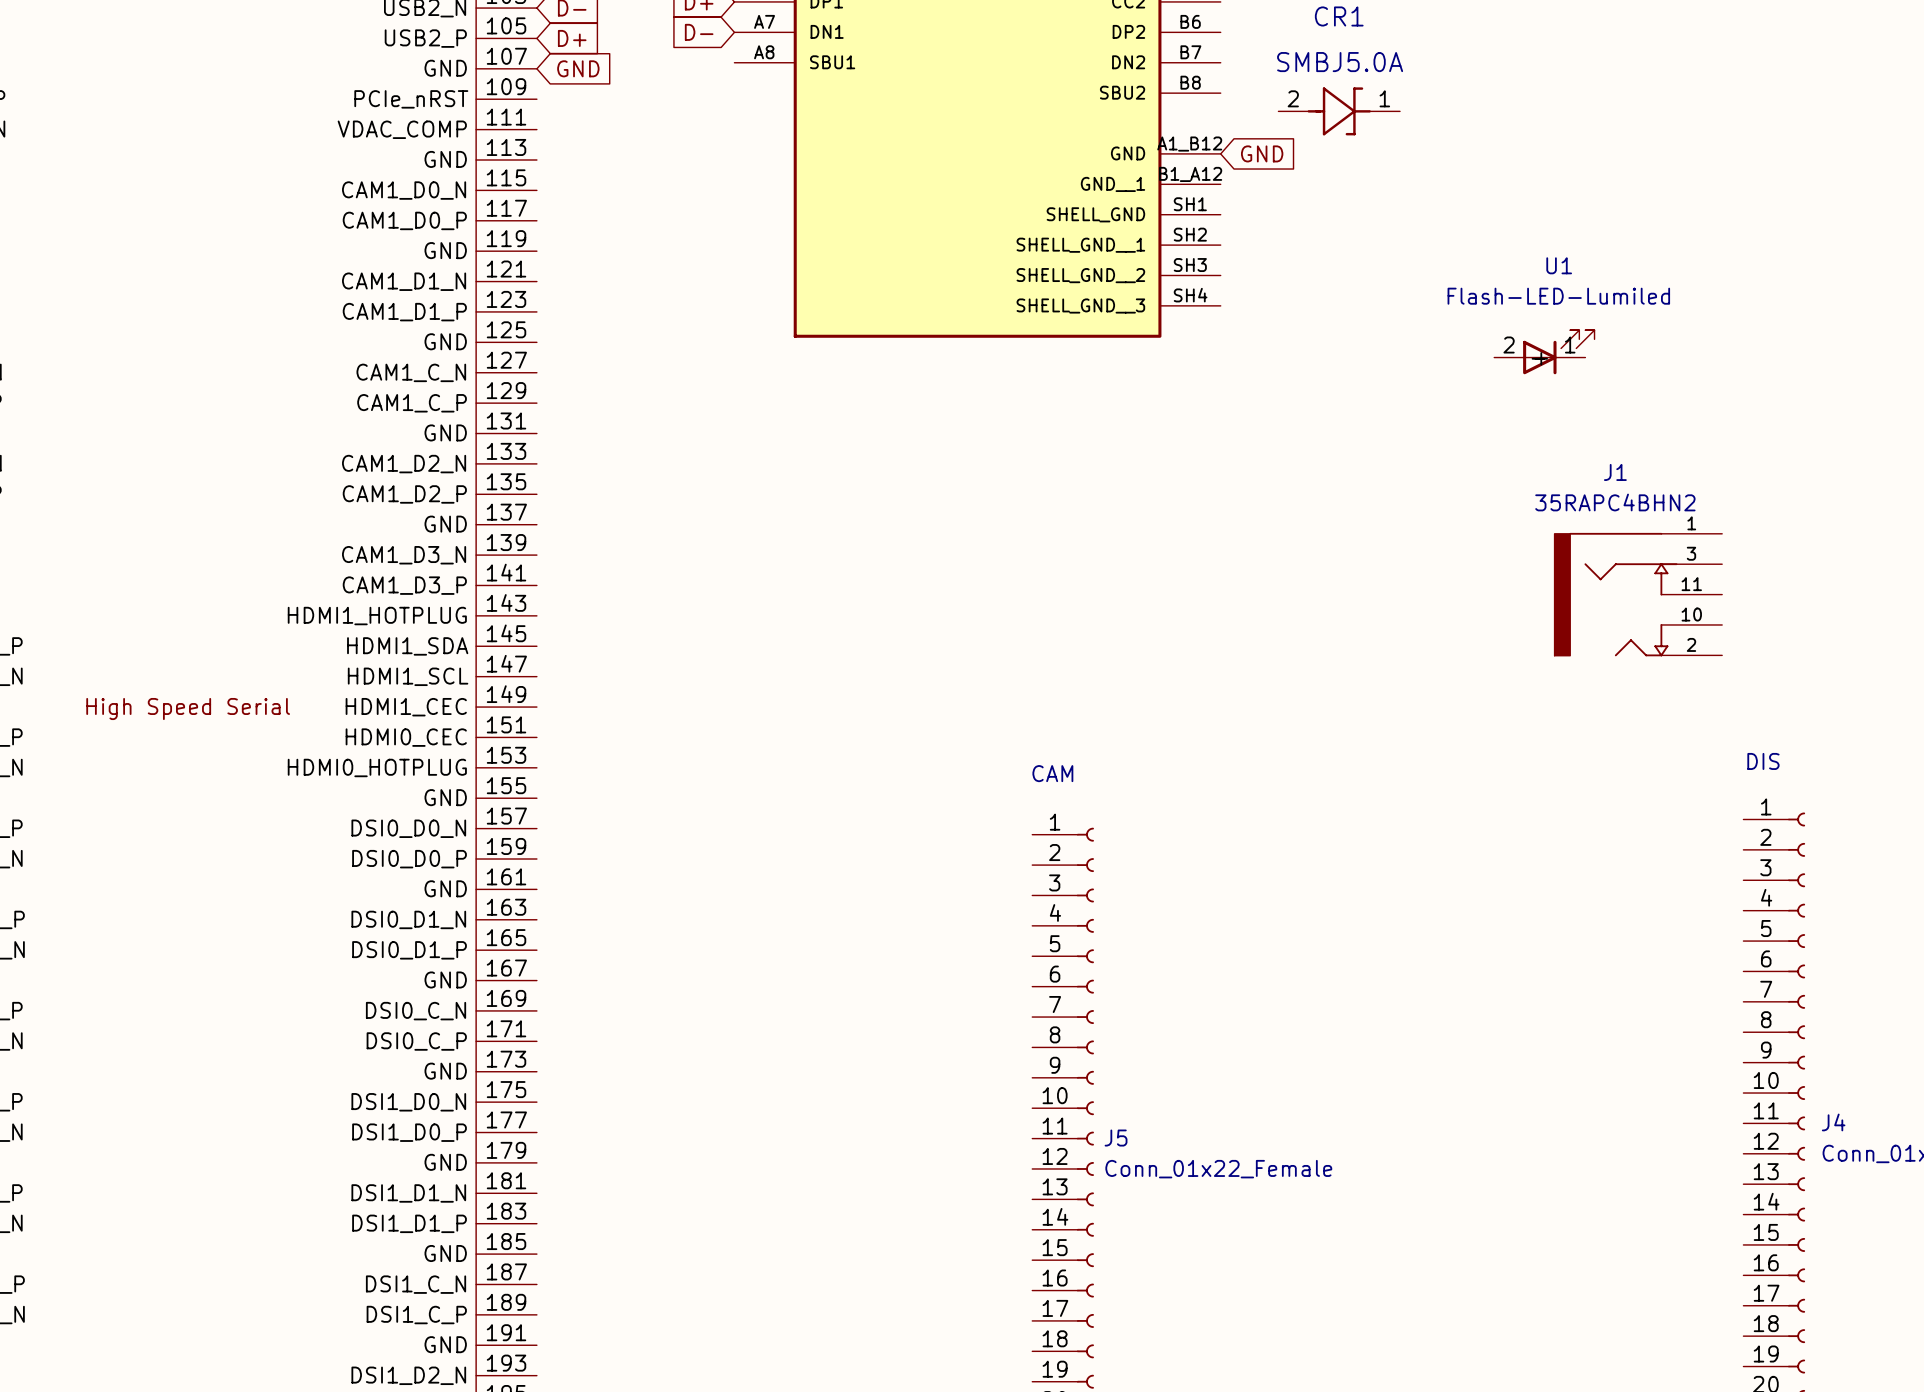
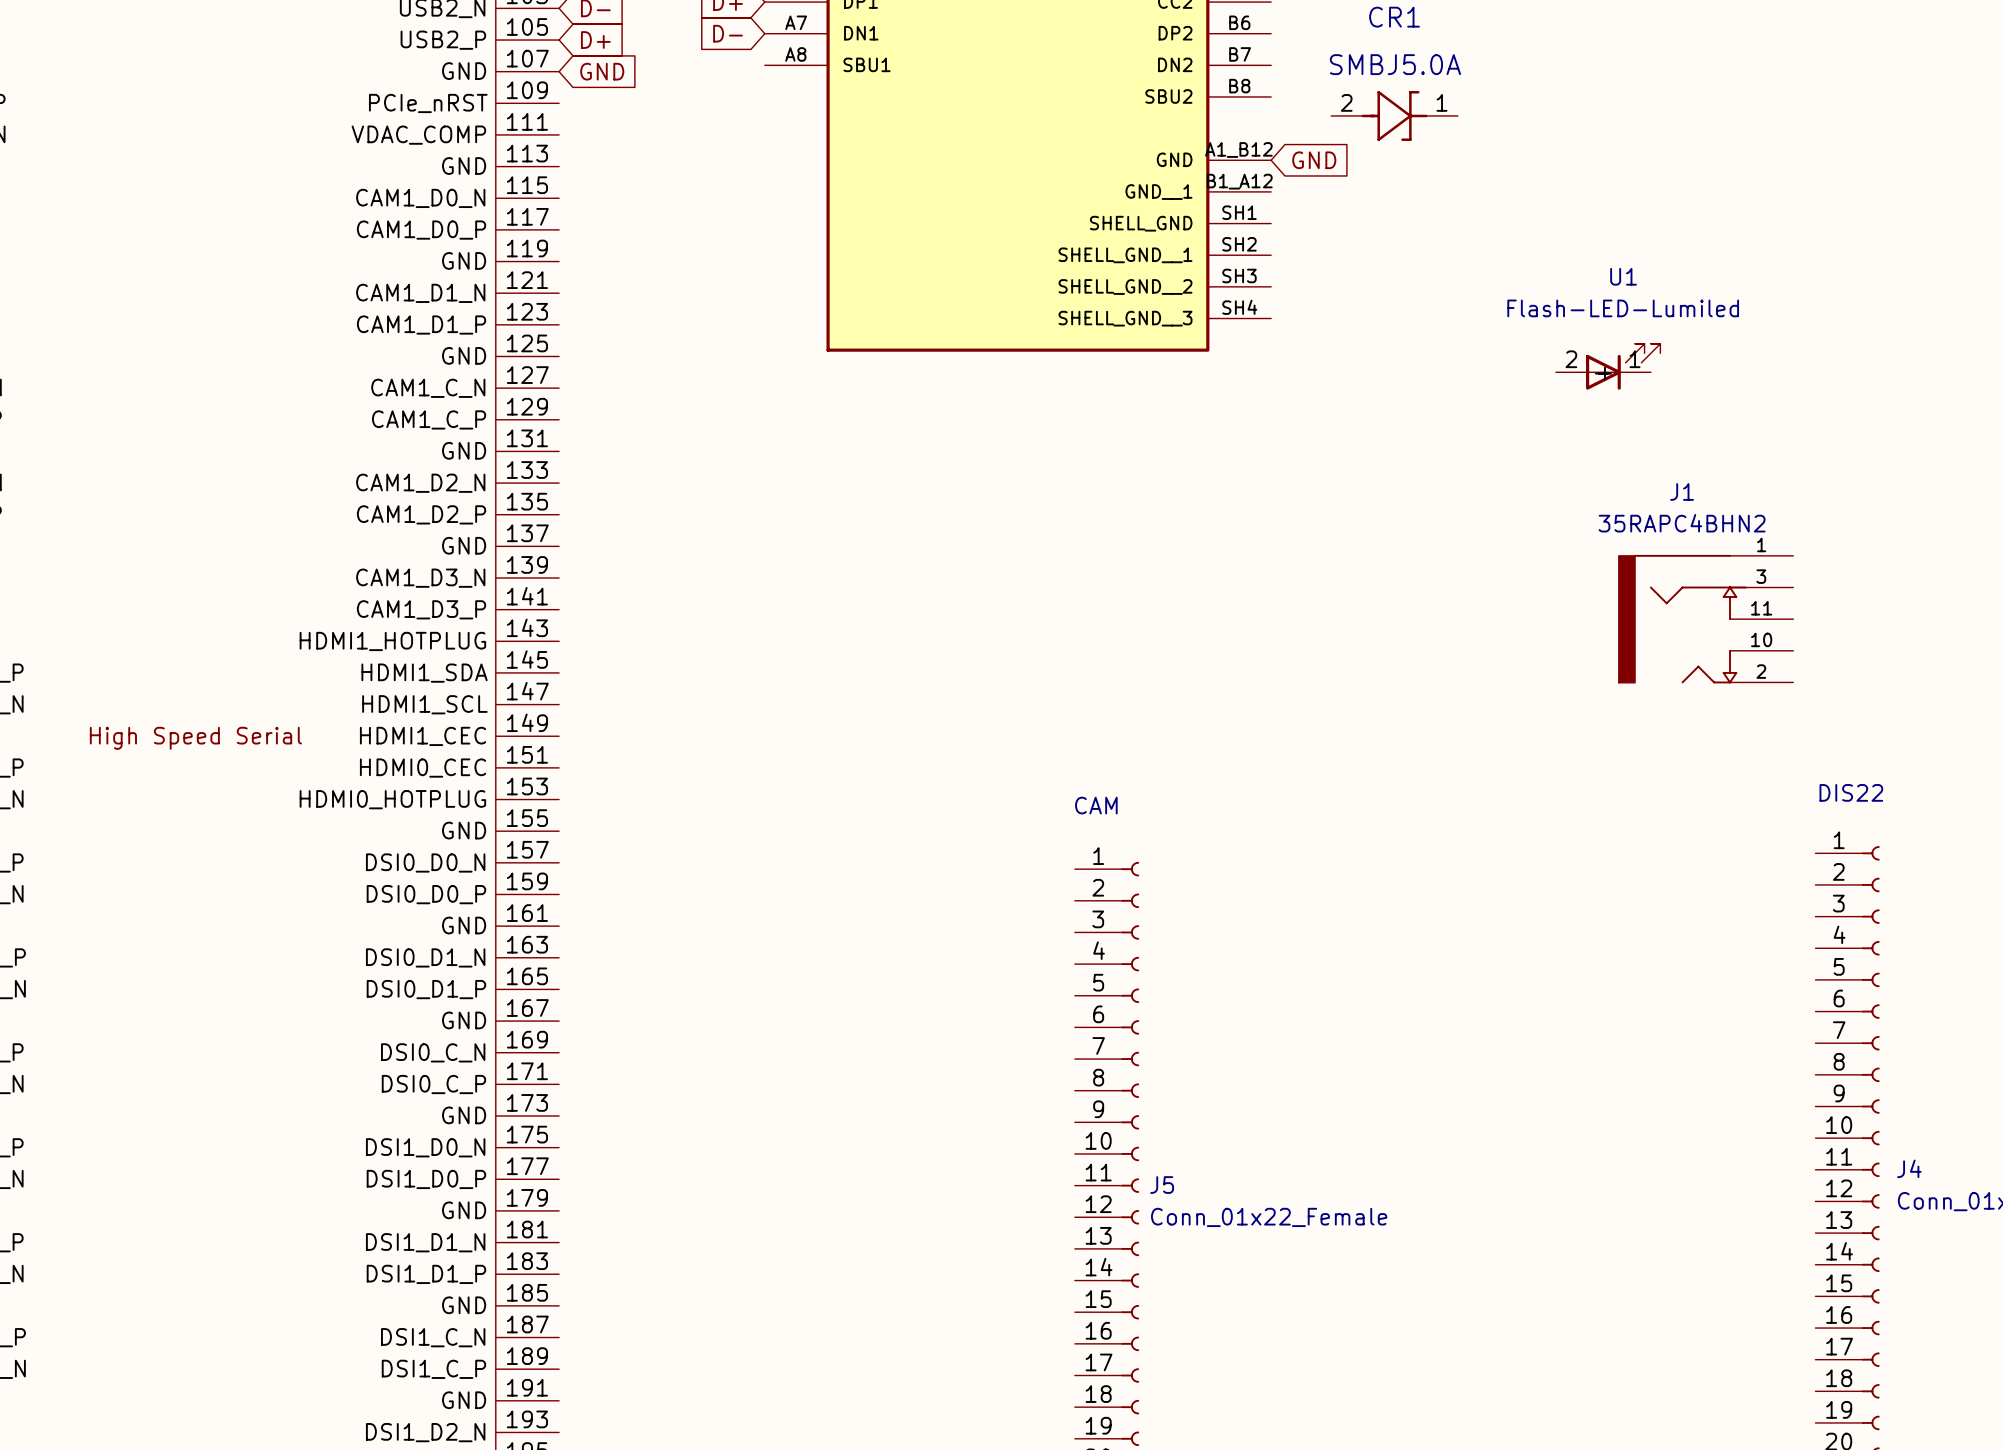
text: DIS (1763, 761) -> DIS22 (1851, 792)

